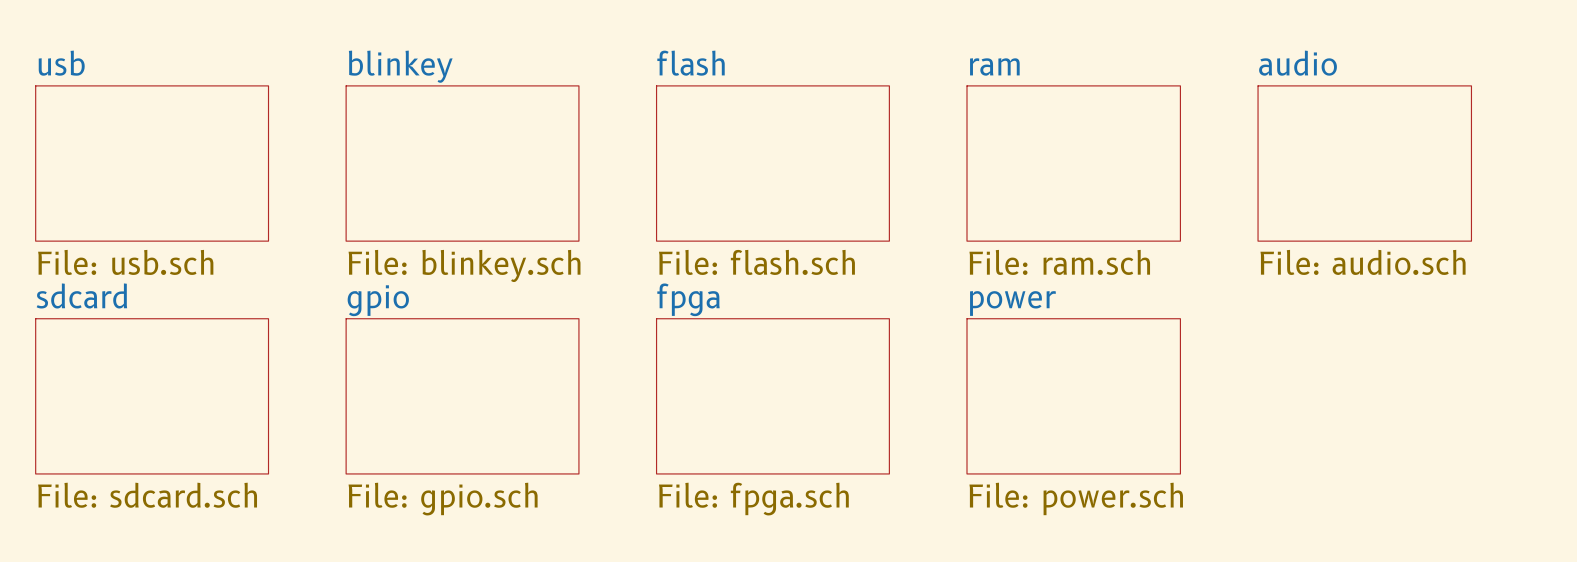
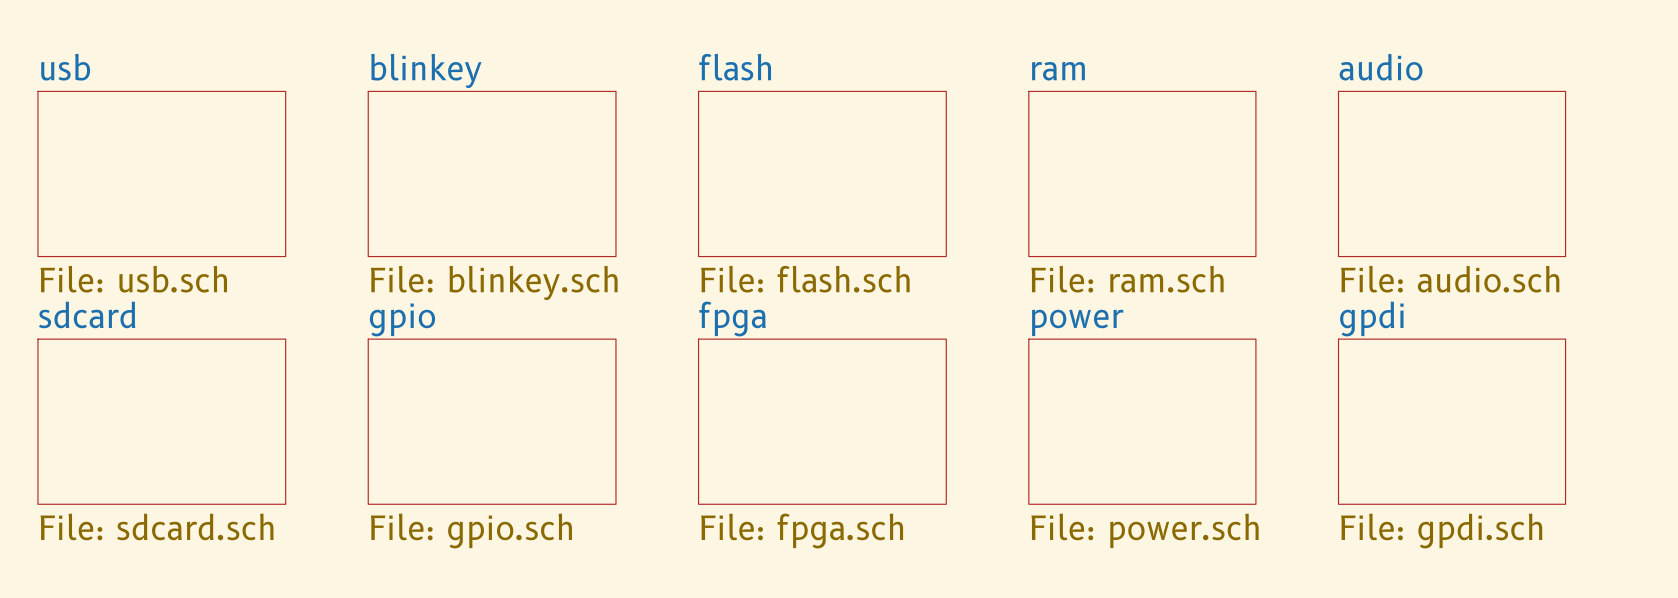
sheet gpdi: none -> File: gpdi.sch (1452, 421)

